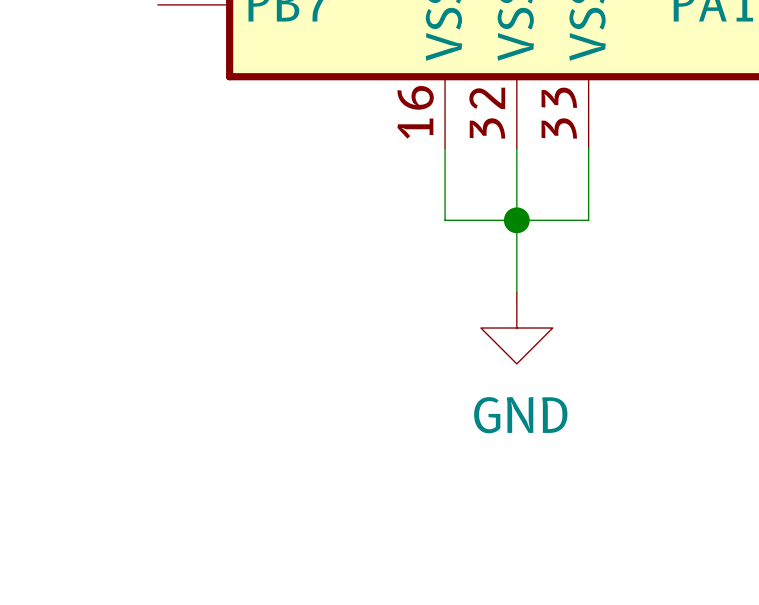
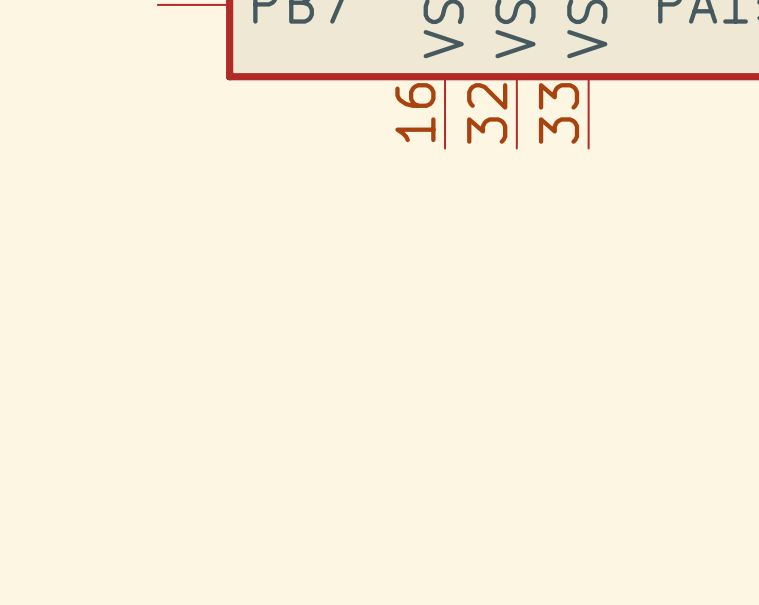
wire: (445, 148) (445, 220) (588, 220) (588, 148) -> none
wire: (516, 148) (516, 292) -> none
junction: (516, 220) -> none
power symbol: GND (516, 328) -> none

